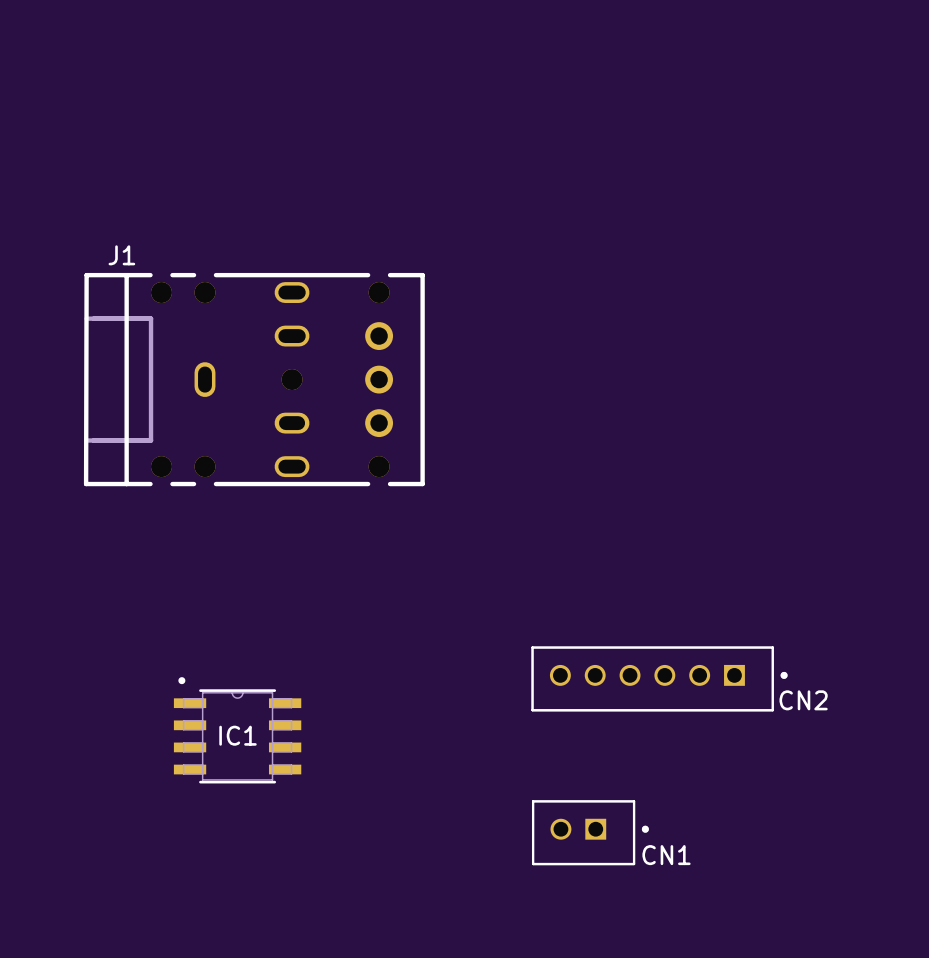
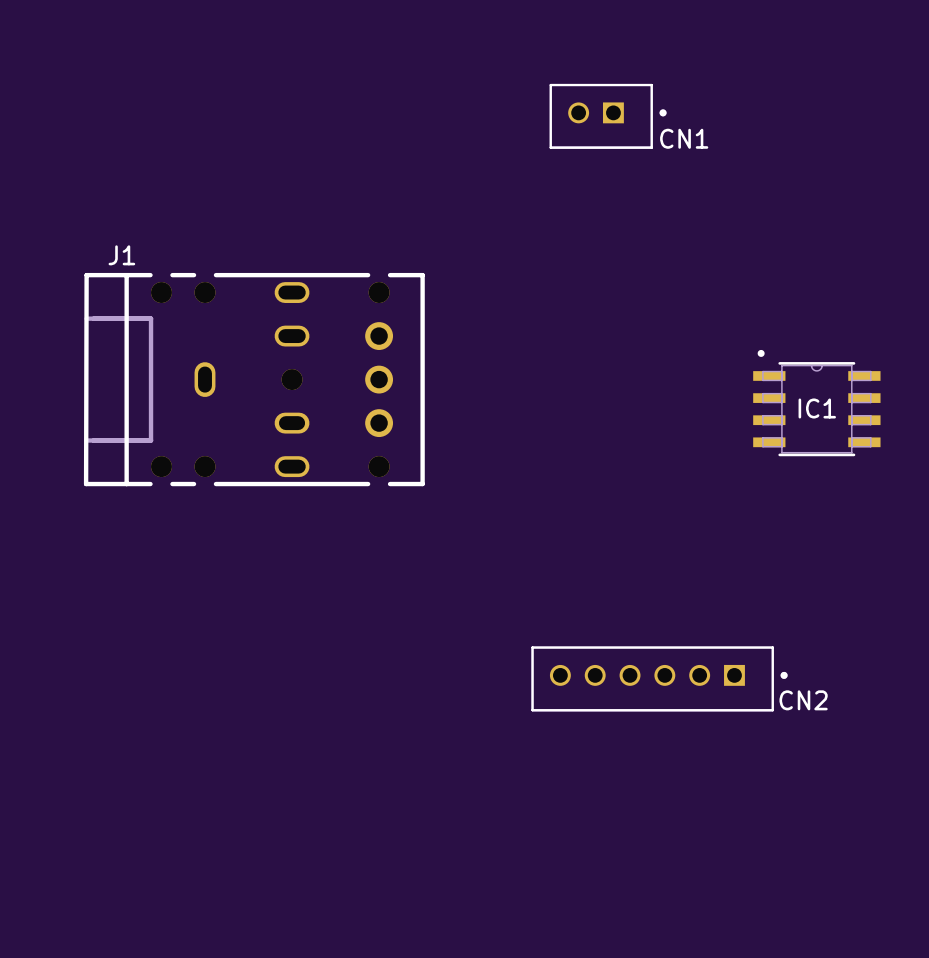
IC1 position: (237, 730) -> (816, 403)
CN1 position: (590, 832) -> (608, 116)

